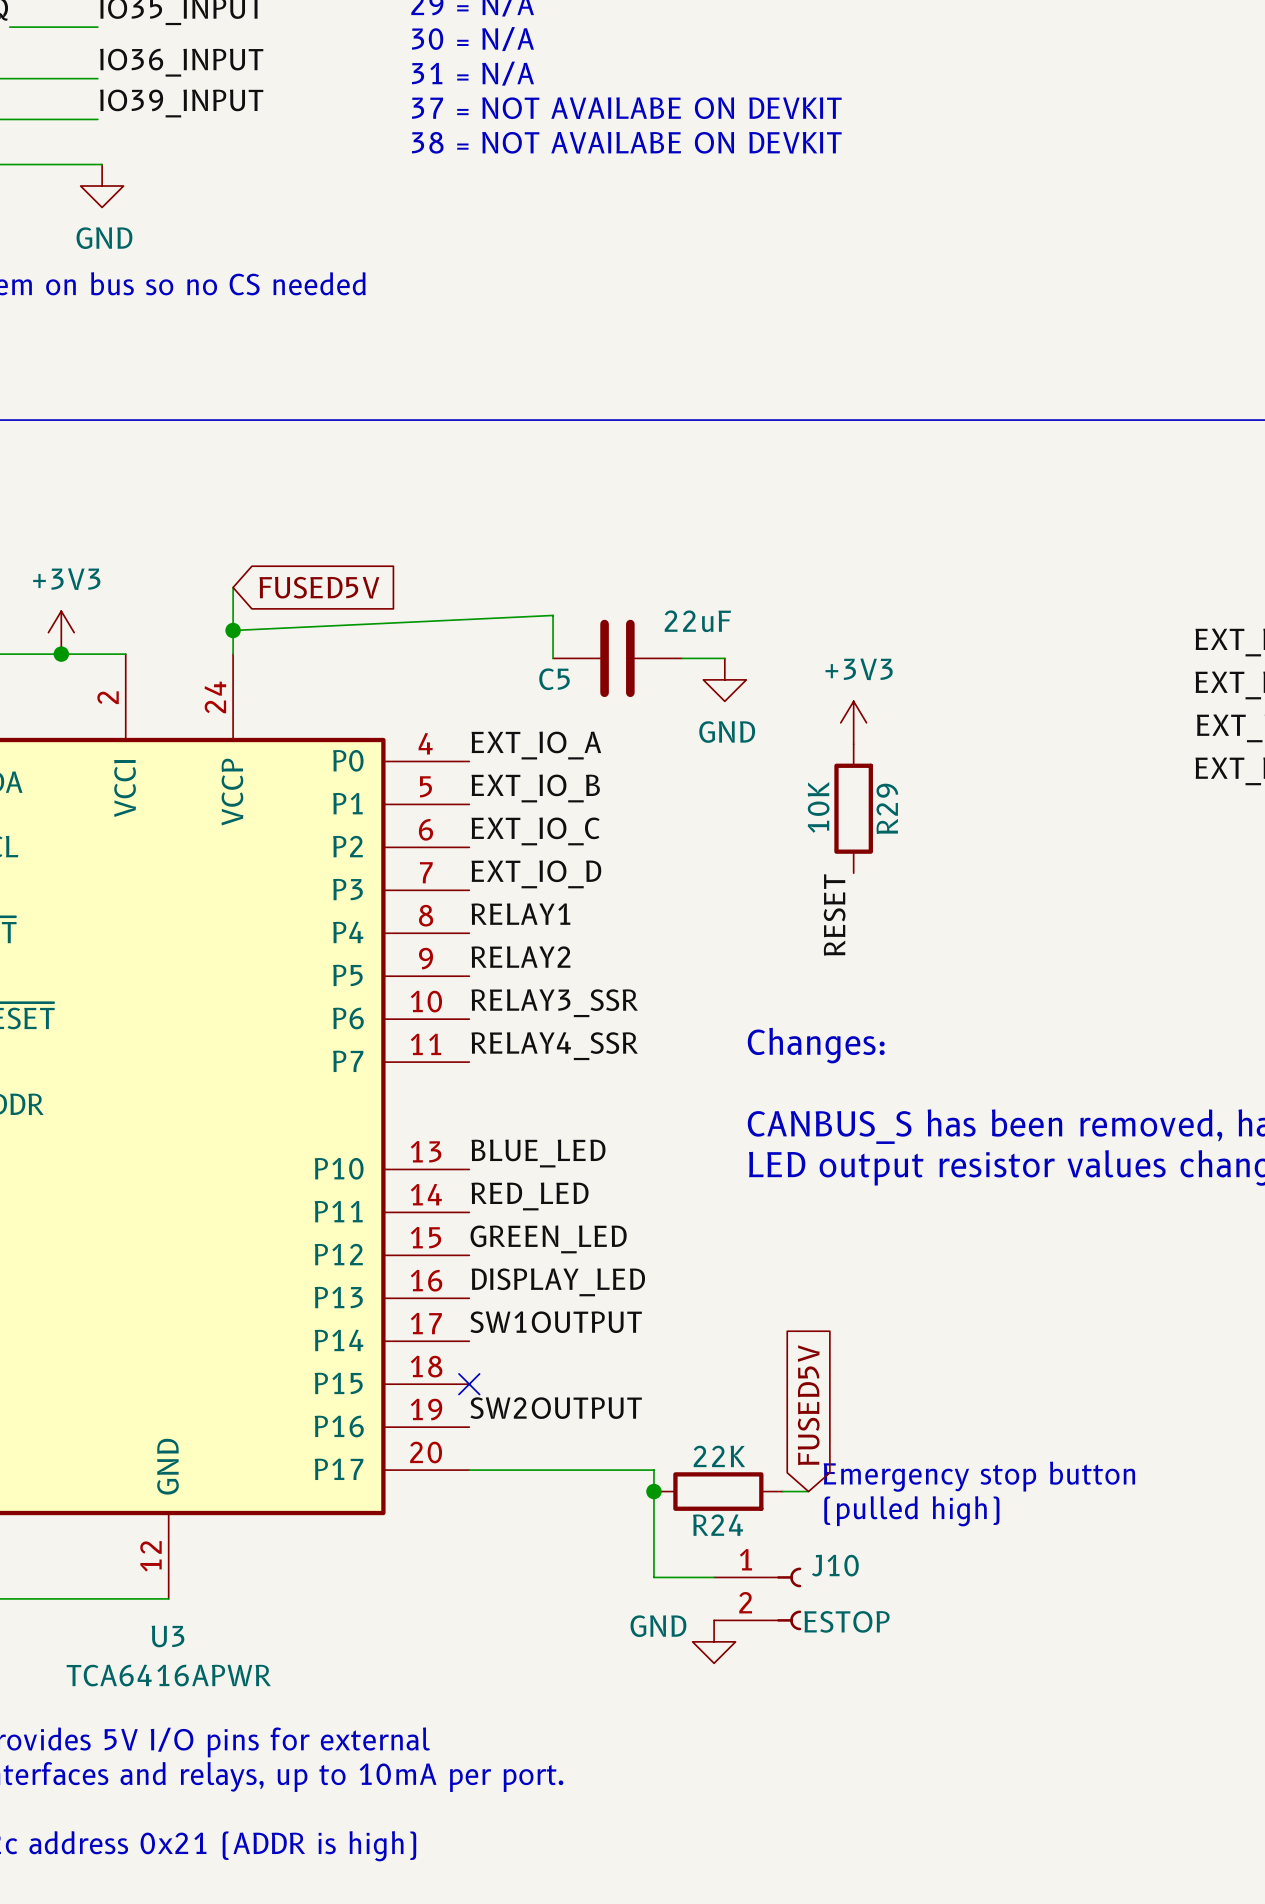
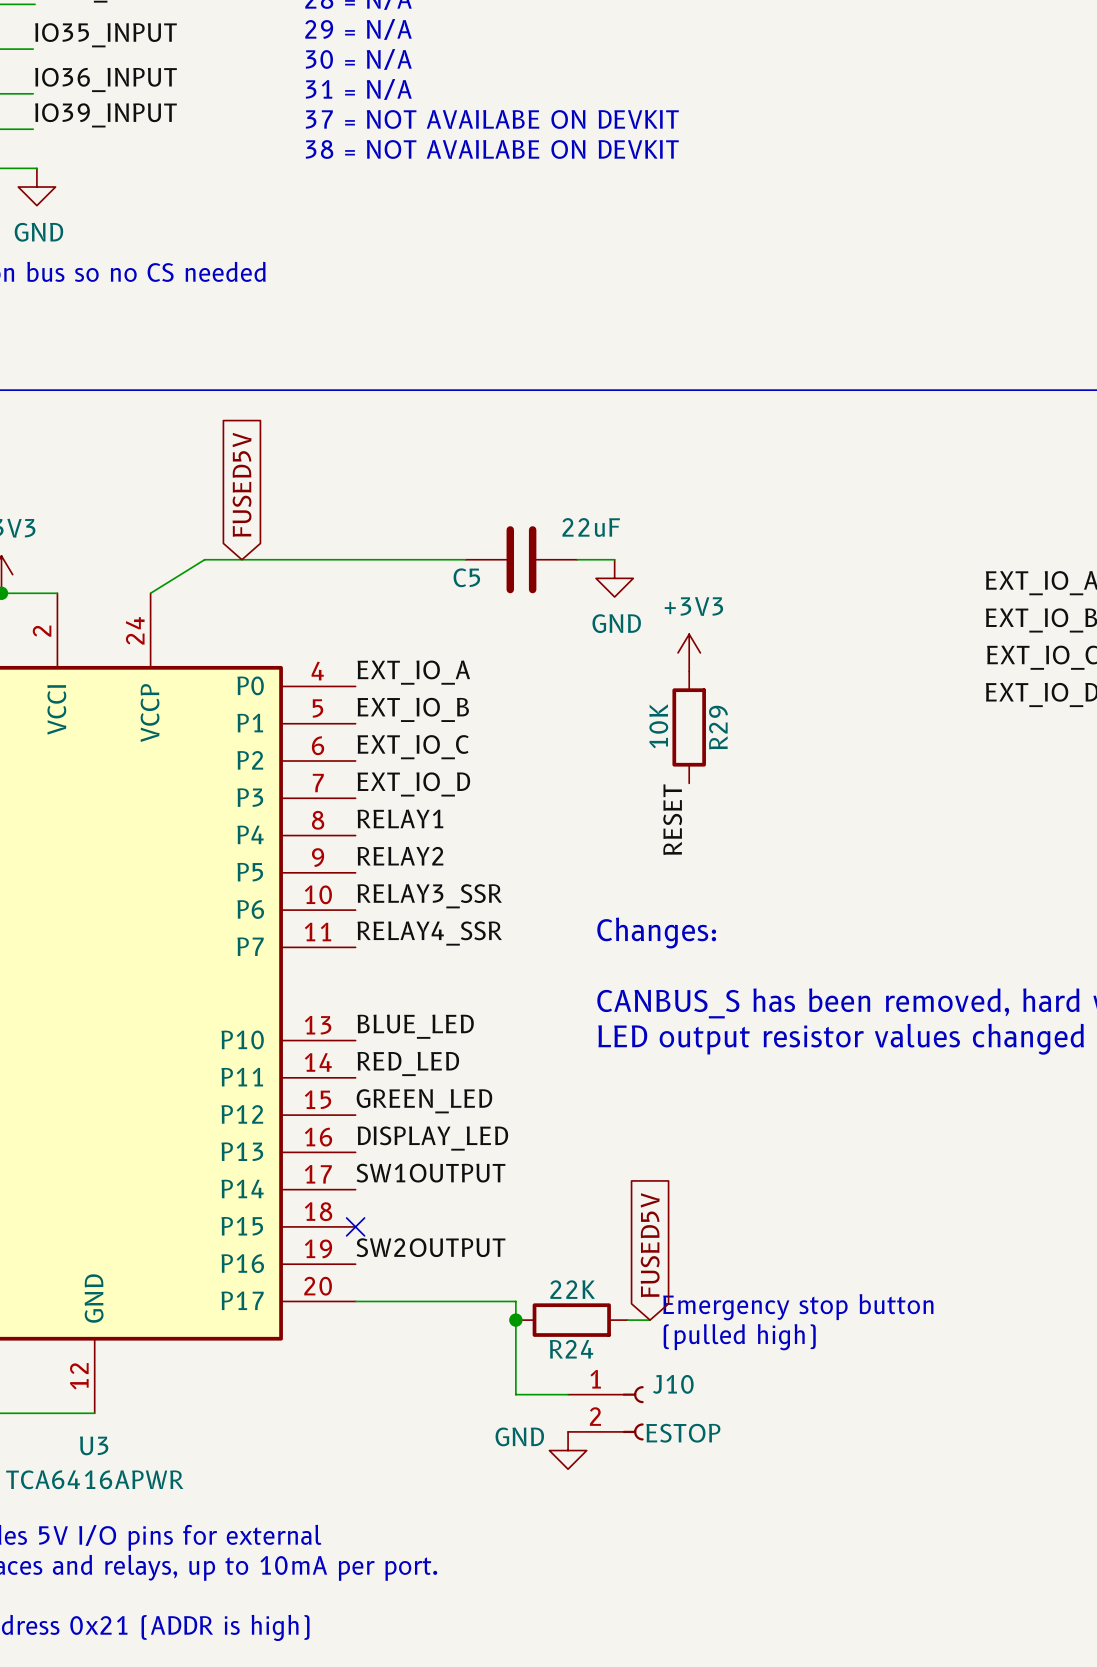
wire: (233, 587) (233, 654) -> (465, 559) (204, 559) (150, 593)
global label rotation: 0° (319, 587) -> 90° counterclockwise (242, 484)
wire: (233, 630) (553, 615) (553, 658) -> none
junction: (233, 630) -> none
C5 position: (617, 658) -> (521, 559)
wire: (681, 658) (724, 658) -> (577, 559) (614, 559)
power symbol position: GND (724, 679) -> GND (614, 578)

